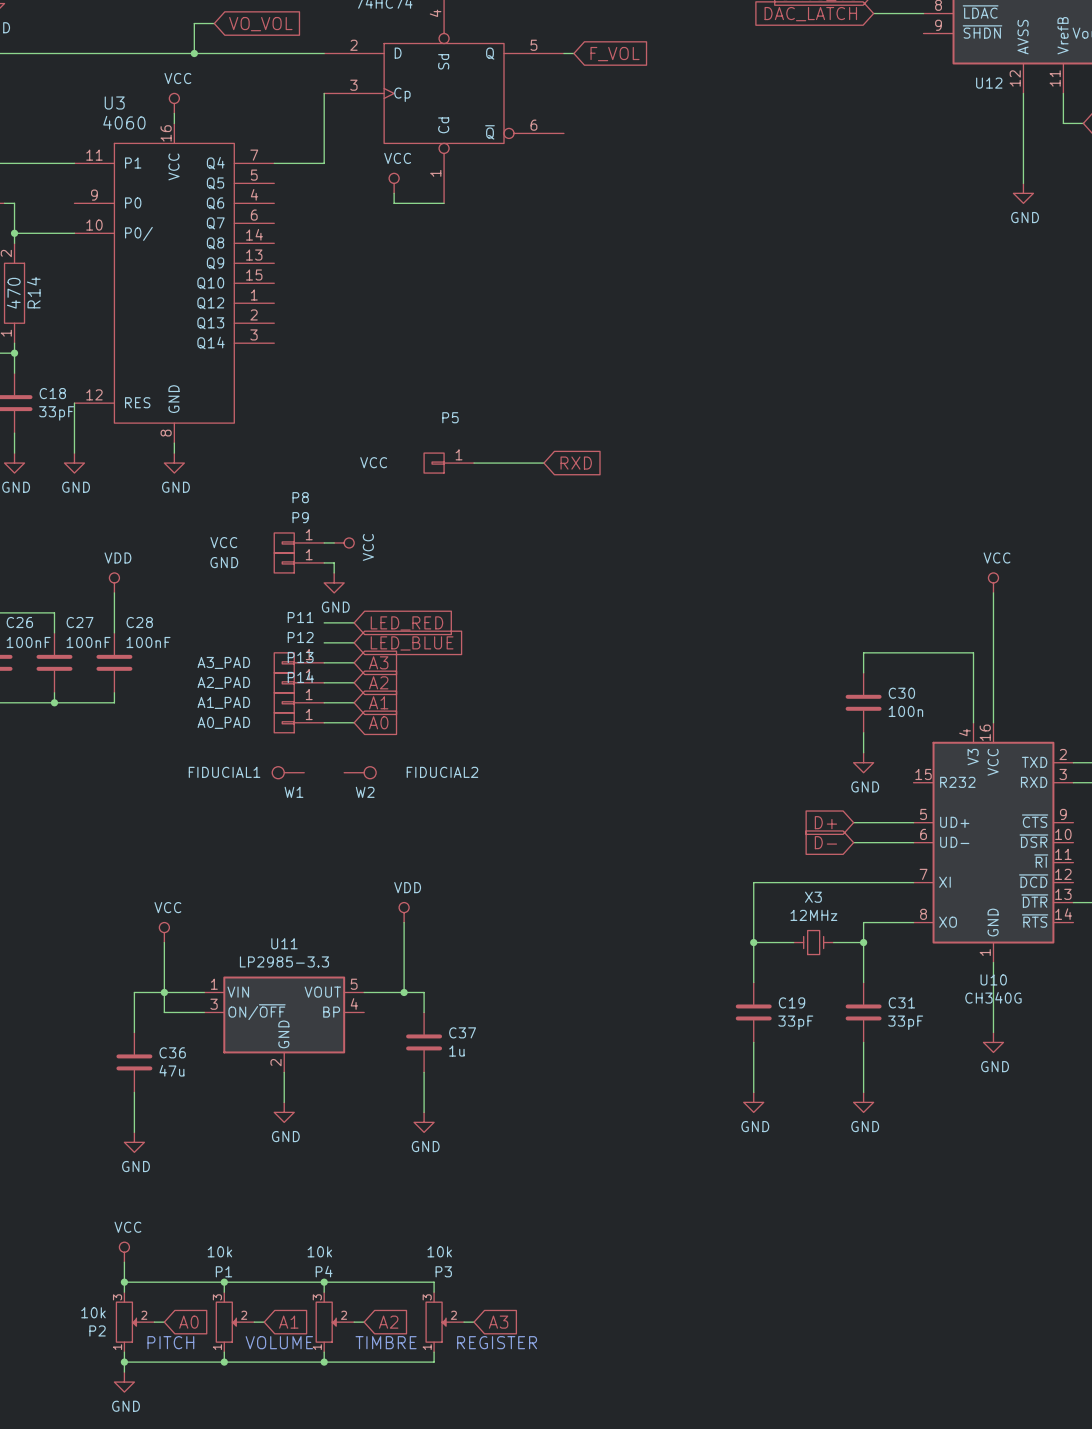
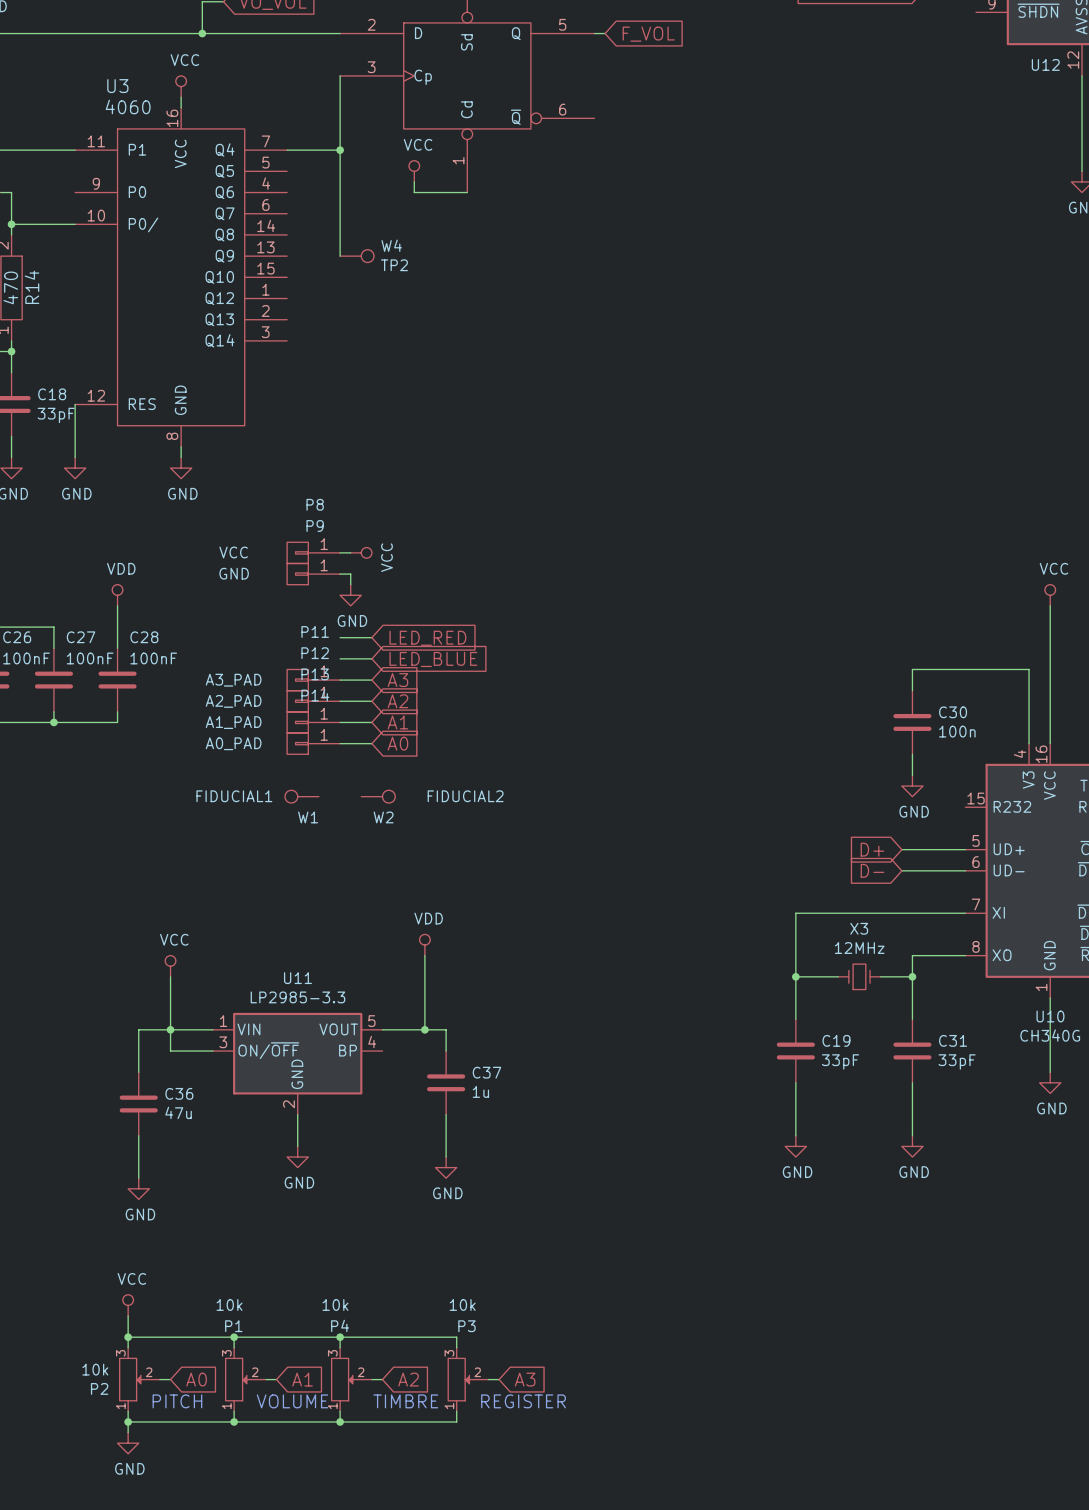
wire: none -> (340, 150) (340, 256)
junction: none -> (340, 150)
W4: none -> TP2 (357, 256)
P5: VCC (449, 463) -> none
wire: (474, 463) (543, 463) -> none
global label: RXD (576, 463) -> none

